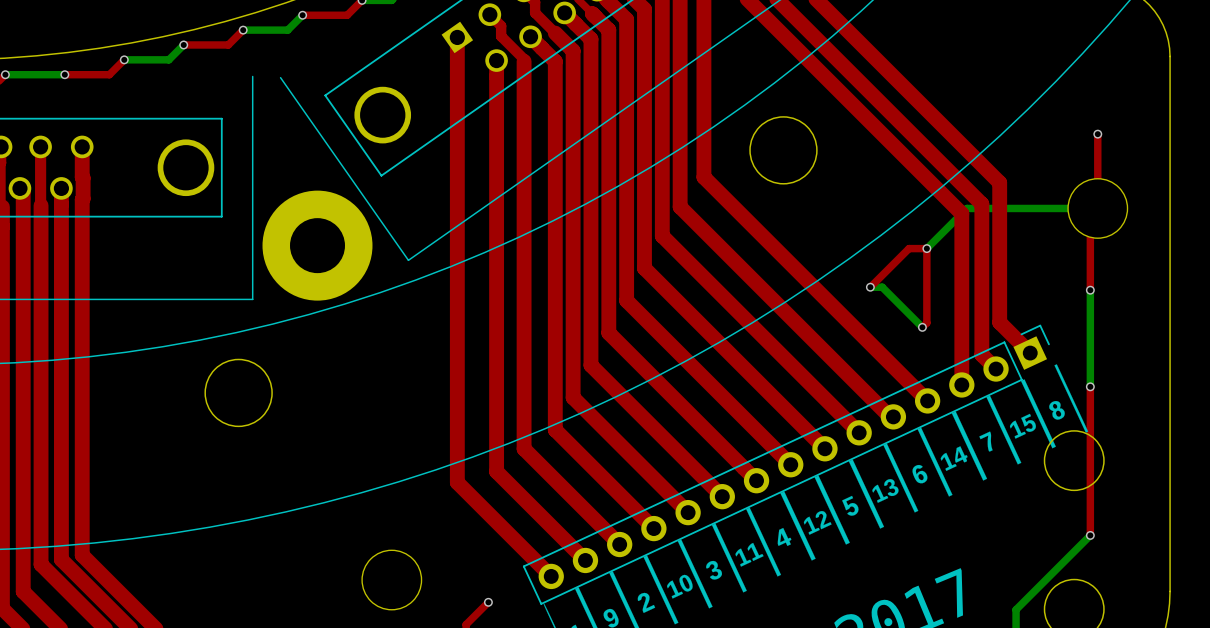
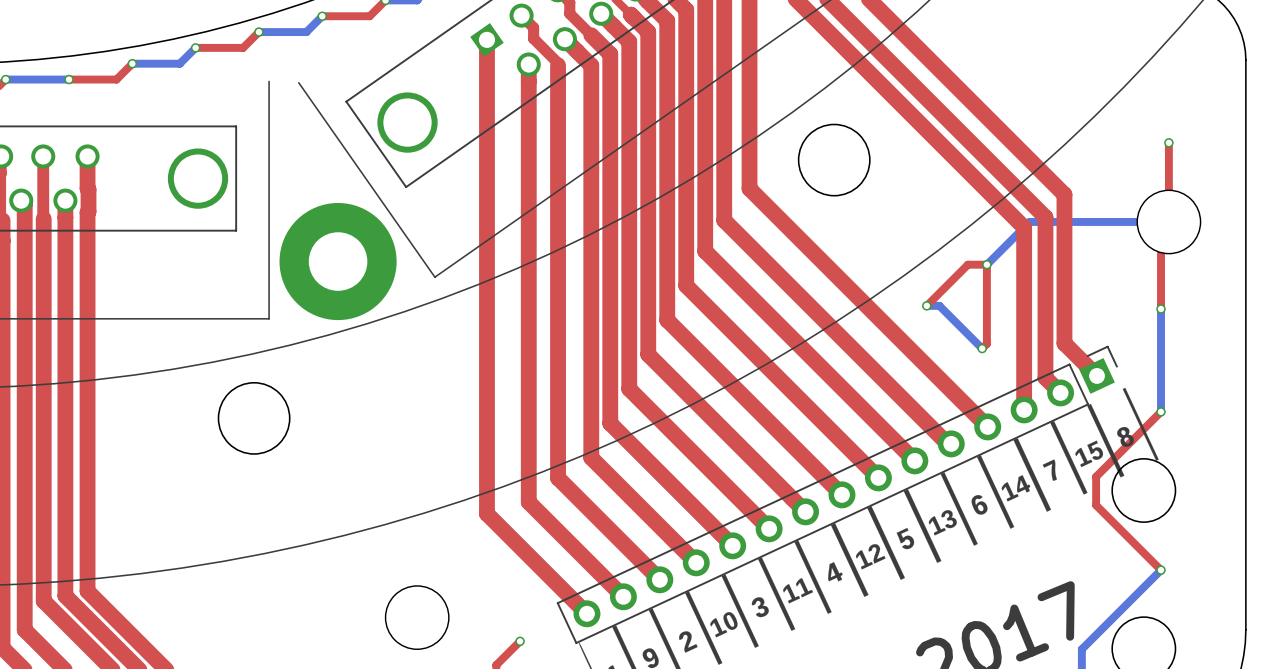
top track: (1090, 386) (1090, 535) -> (1161, 411) (1096, 476) (1096, 505) (1161, 570)

